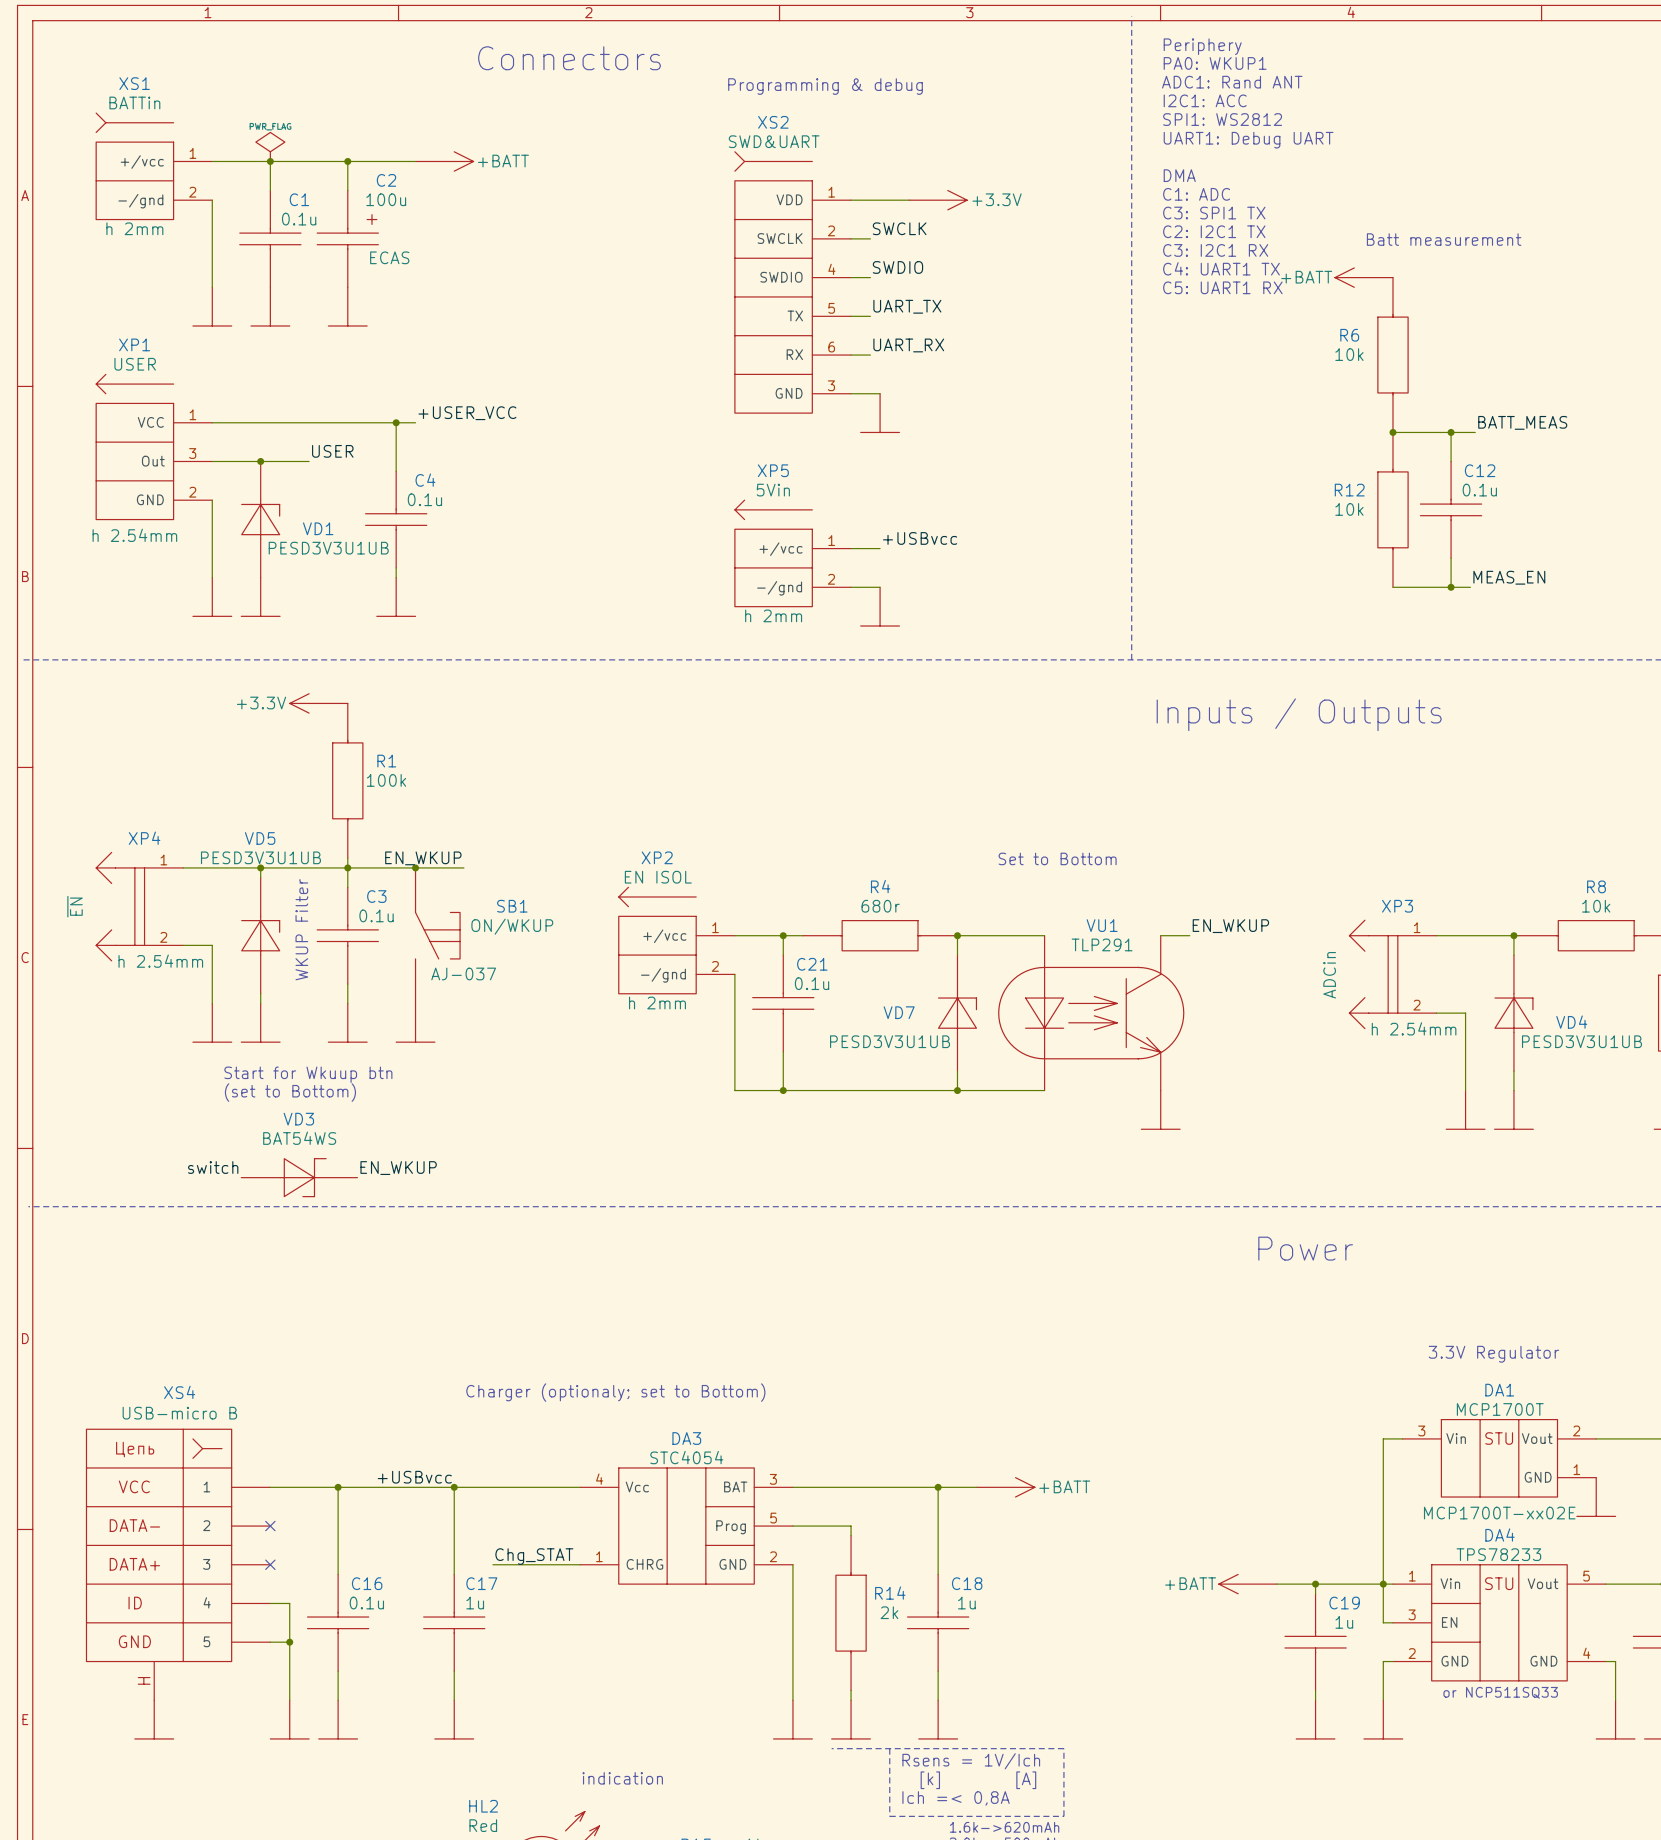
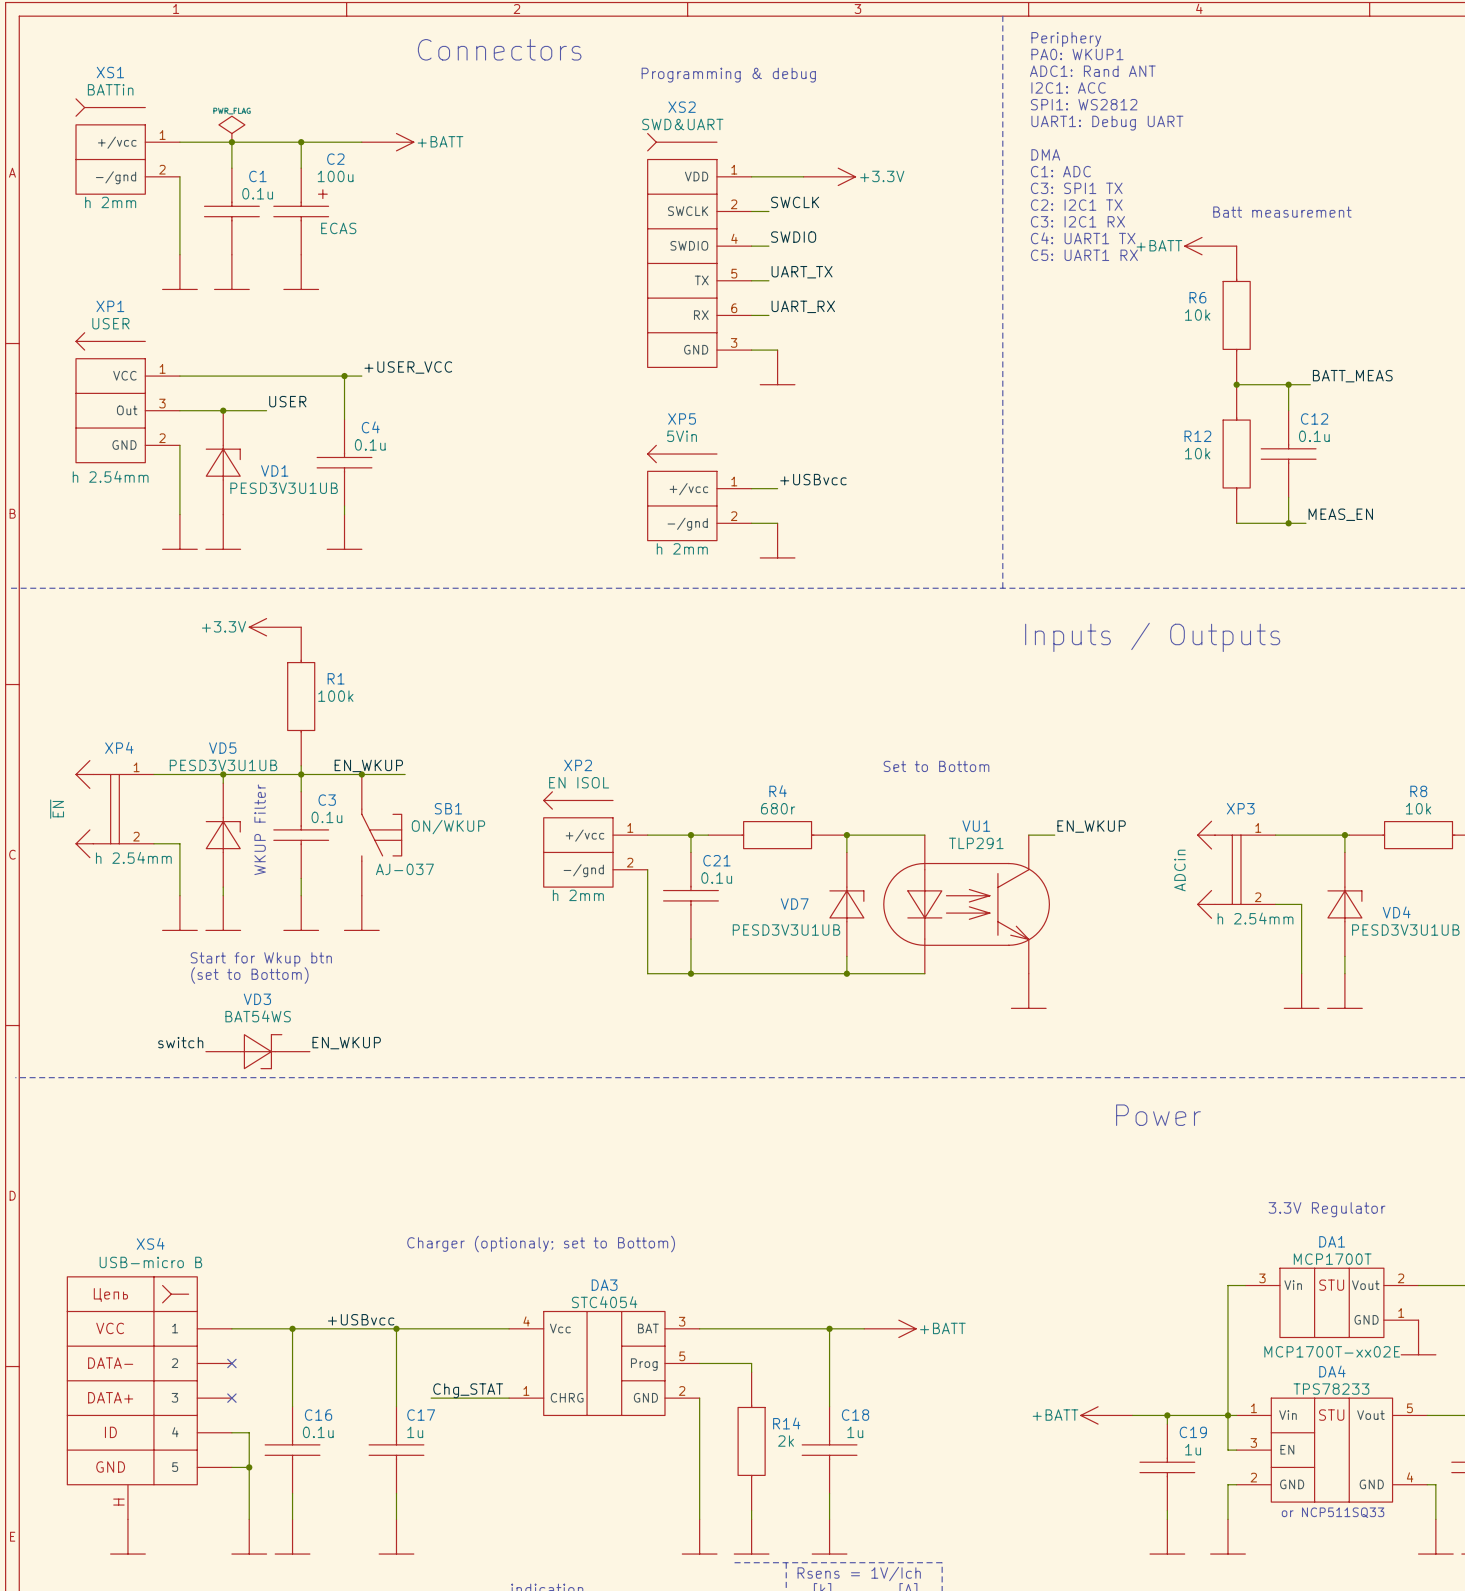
text: Start for Wkuup btn (308, 1074) -> Start for Wkup btn (261, 959)

